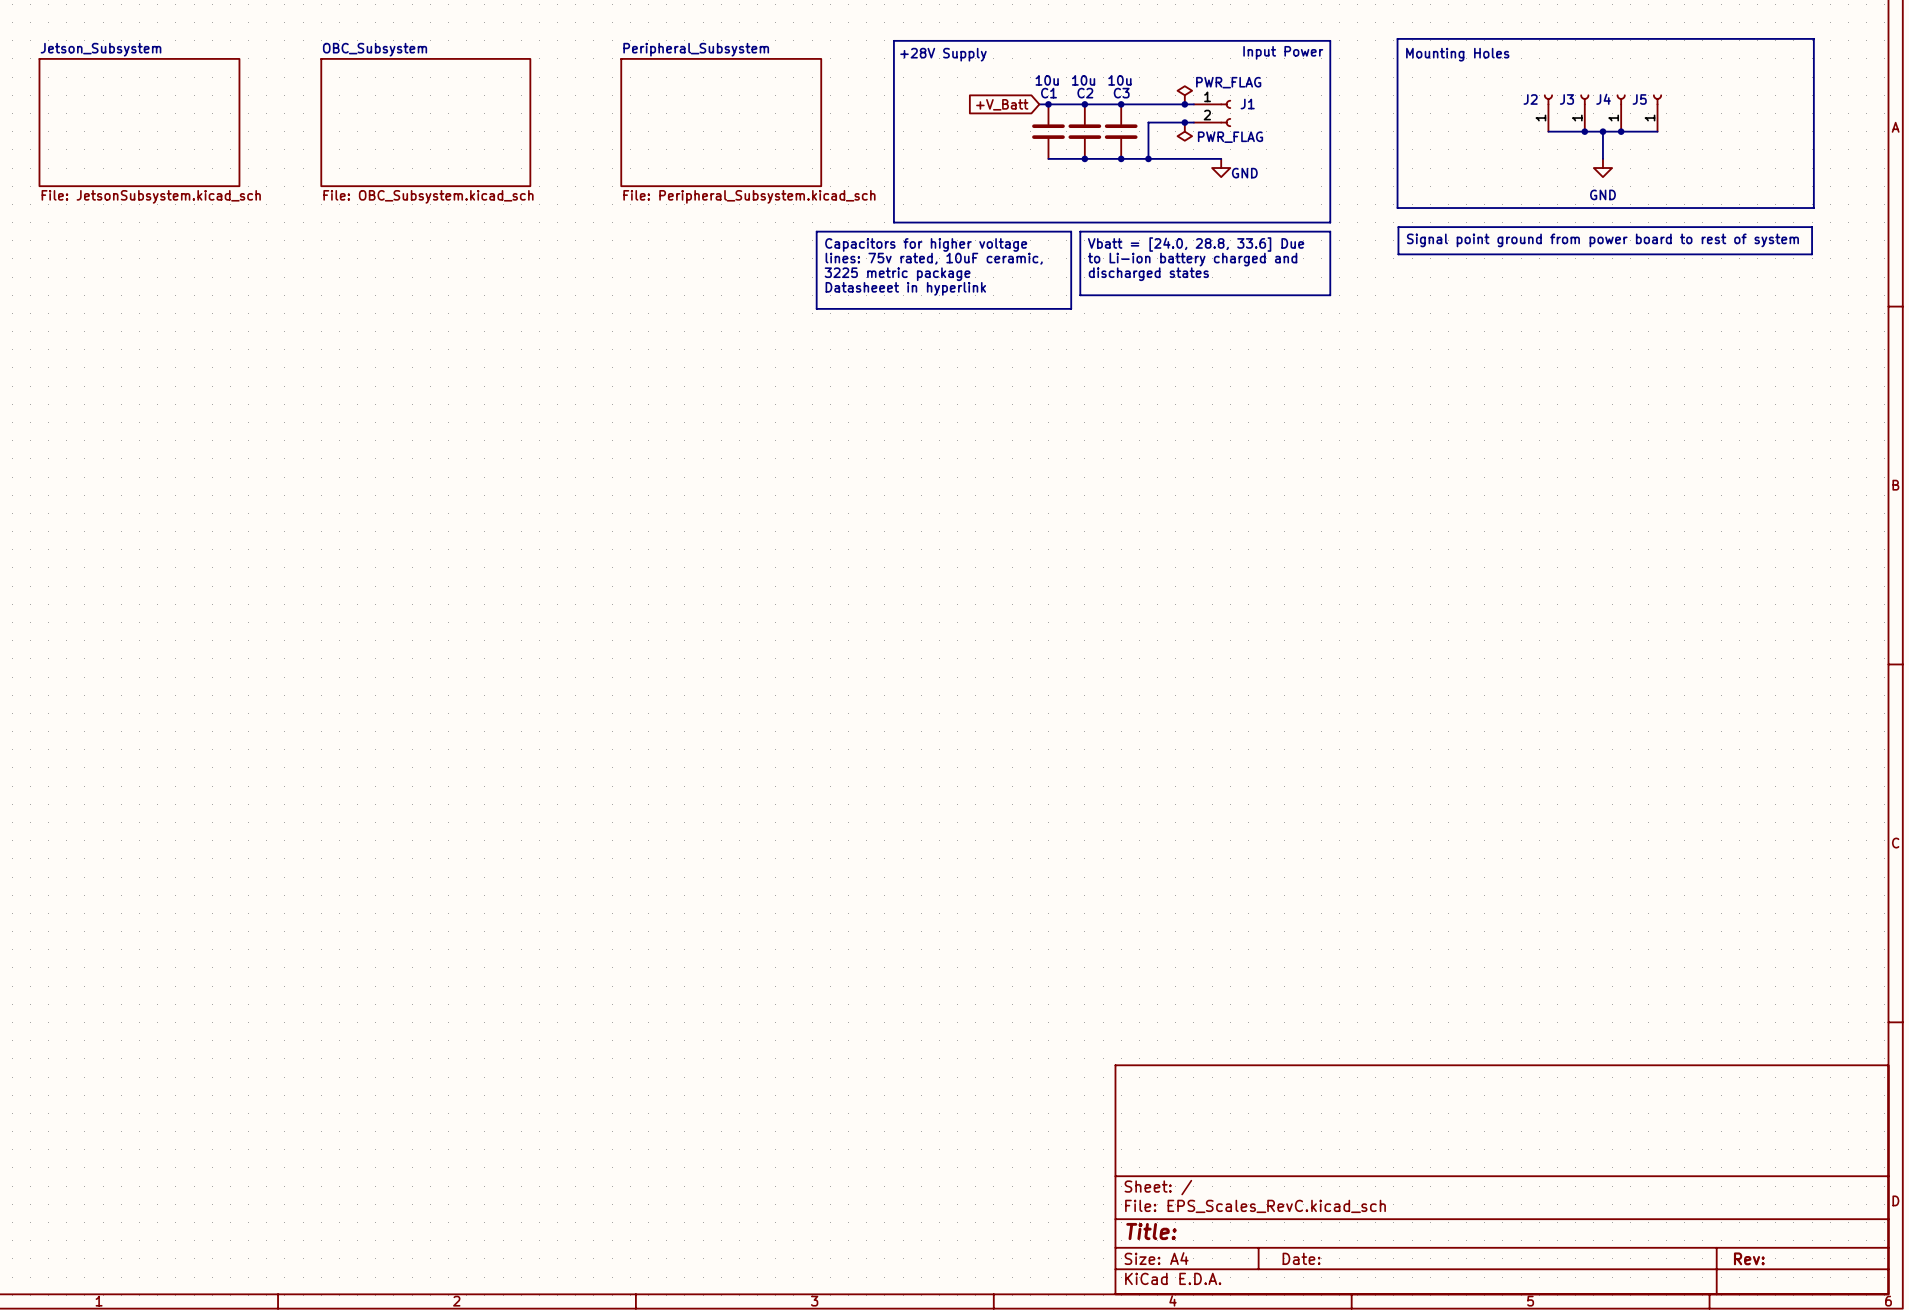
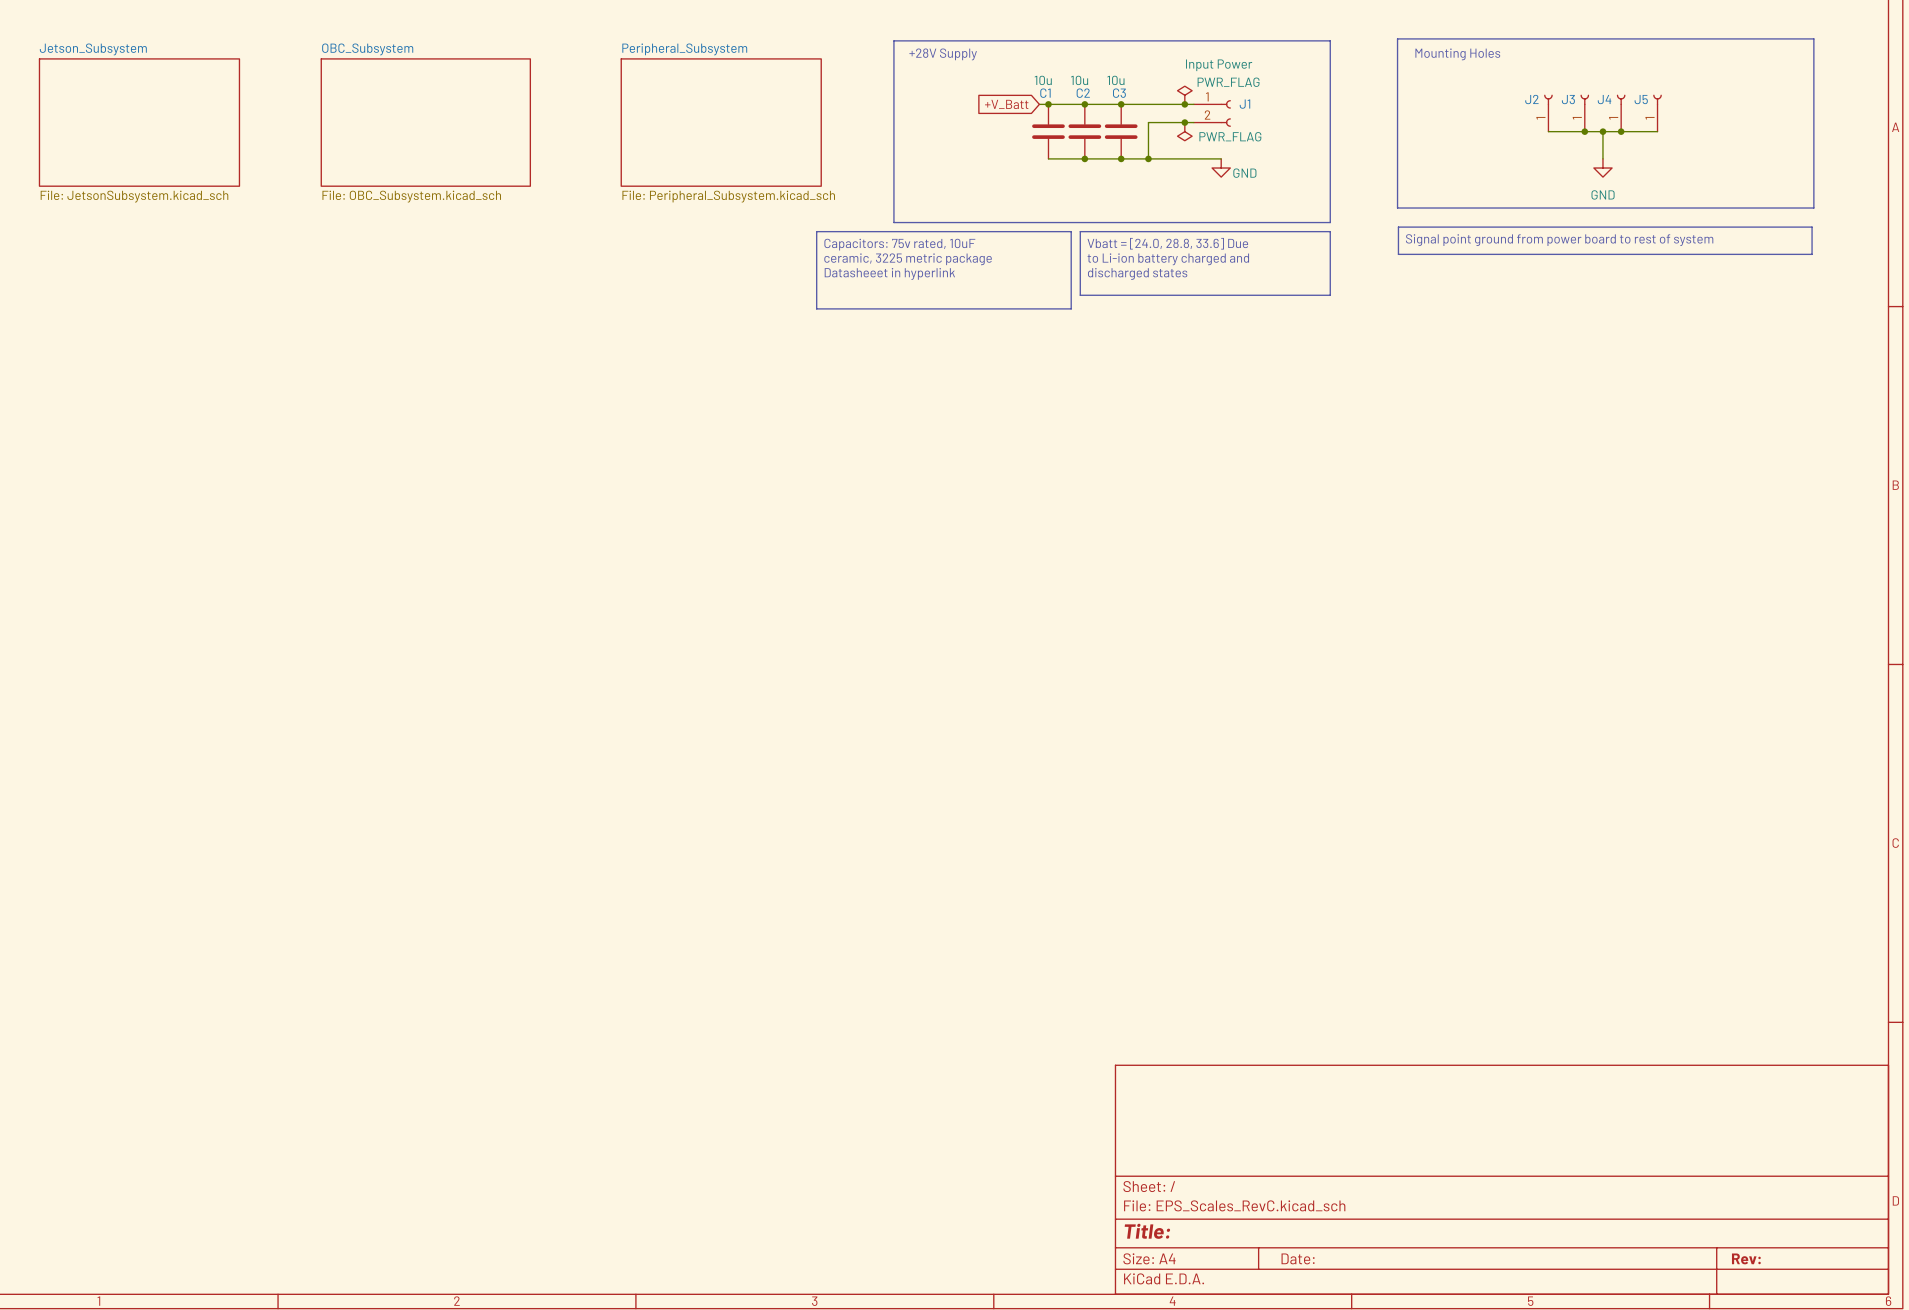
J1 value position: Input Power (1283, 52) -> Input Power (1219, 65)
text: Capacitors for higher voltage (926, 244) -> Capacitors: 75v rated, 10uF (899, 244)
text: lines: 75v rated, 10uF ceramic, (934, 258) -> ceramic, 3225 metric package (908, 259)
text: 3225 metric package (897, 274) -> Datasheeet in hyperlink (889, 273)
text: Datasheeet in hyperlink (905, 288) -> none

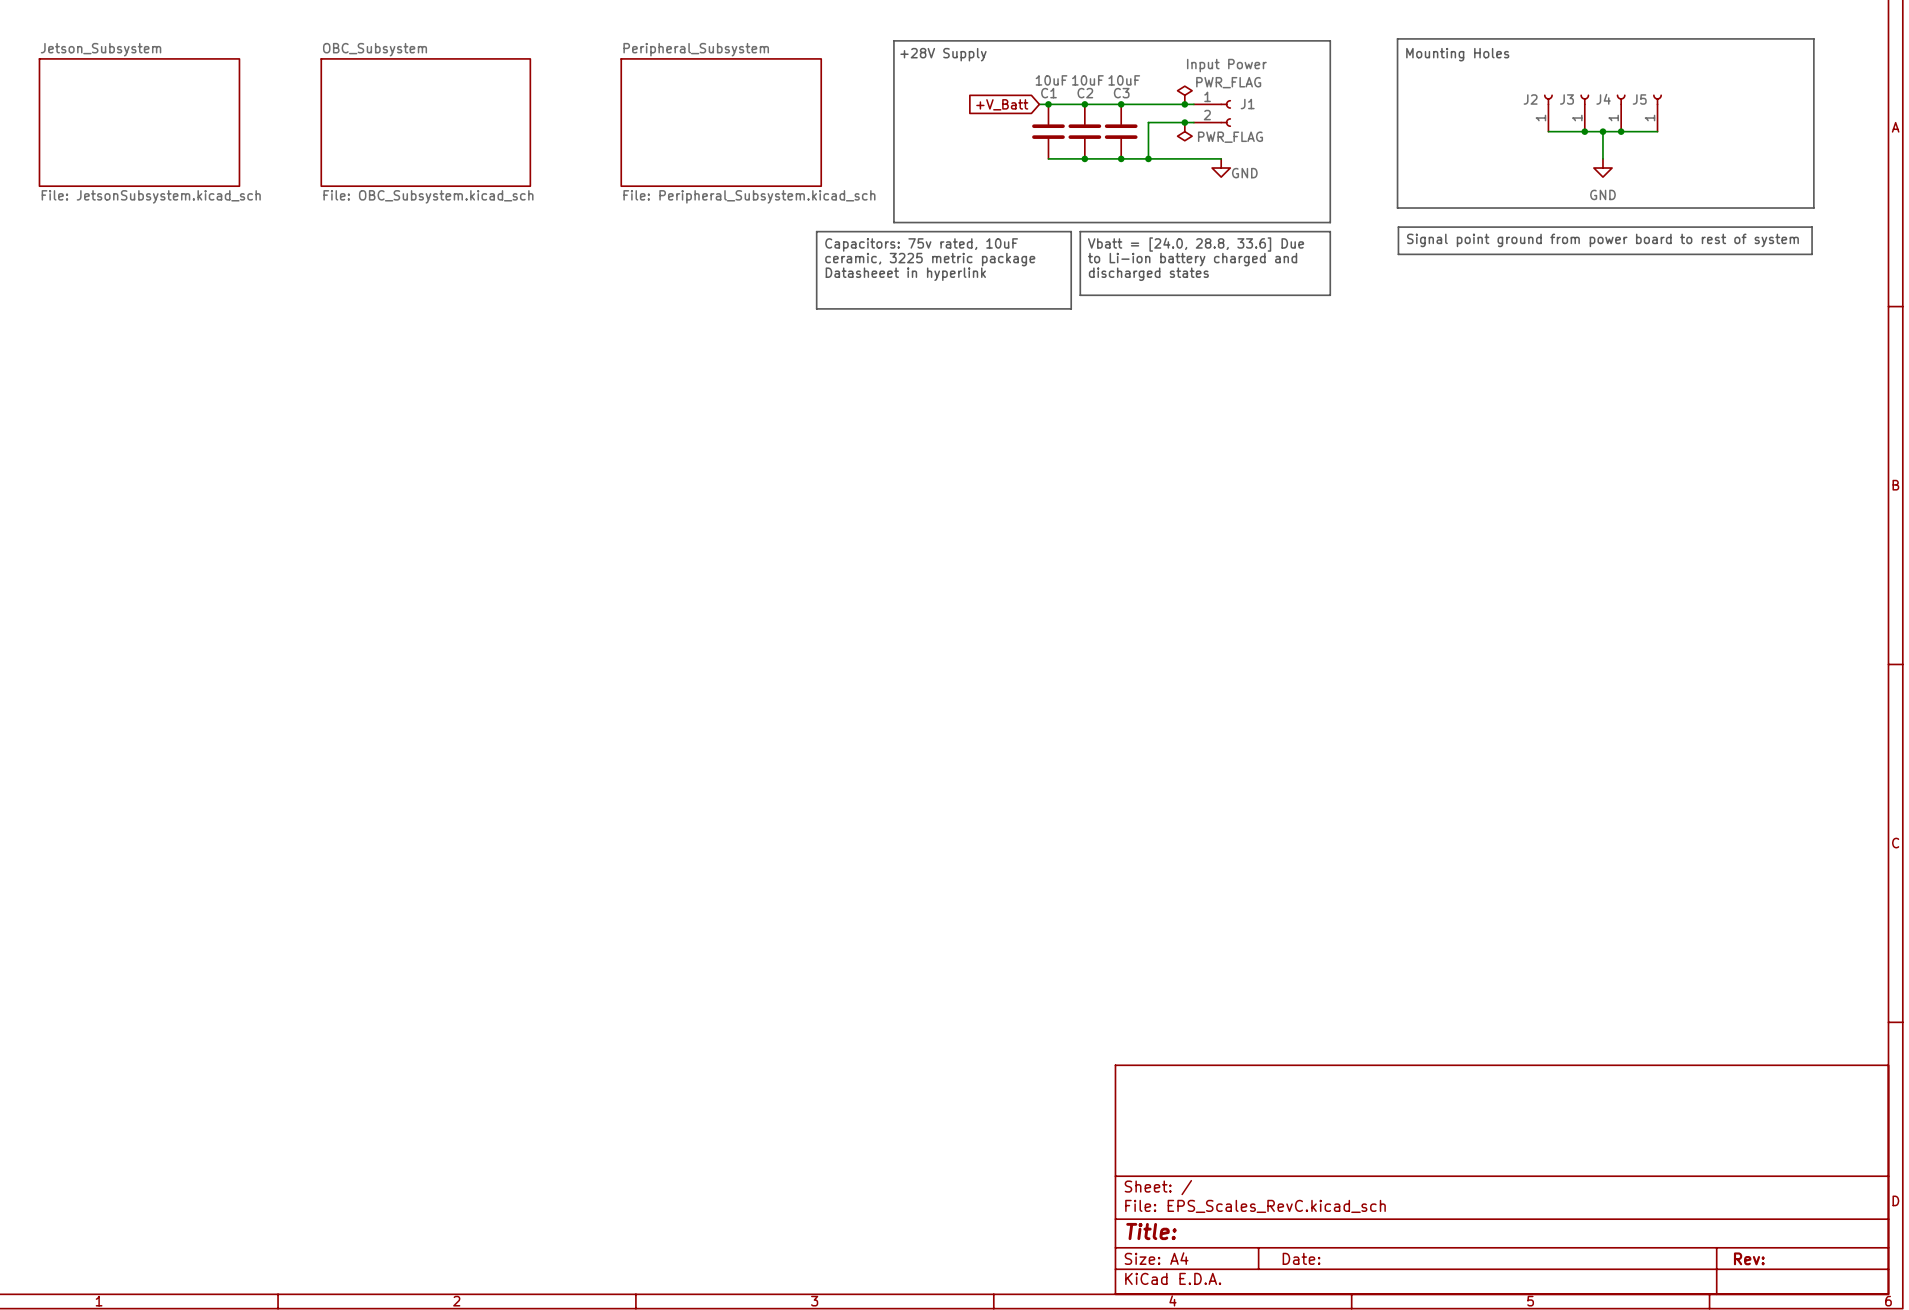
C1 value: 10u (1043, 80) -> 10uF (1051, 80)
C2 value: 10u (1079, 80) -> 10uF (1087, 80)
C3 value: 10u (1115, 80) -> 10uF (1124, 80)

